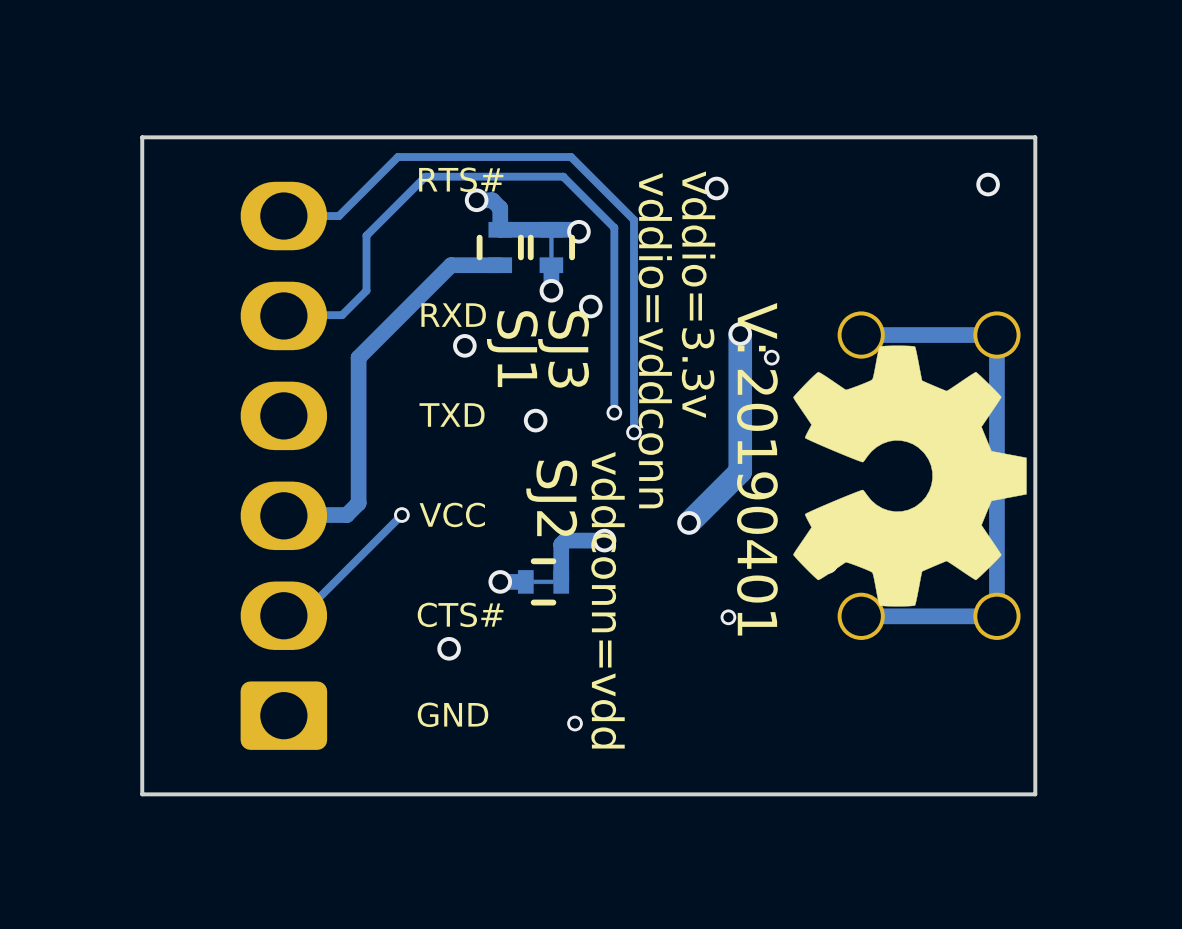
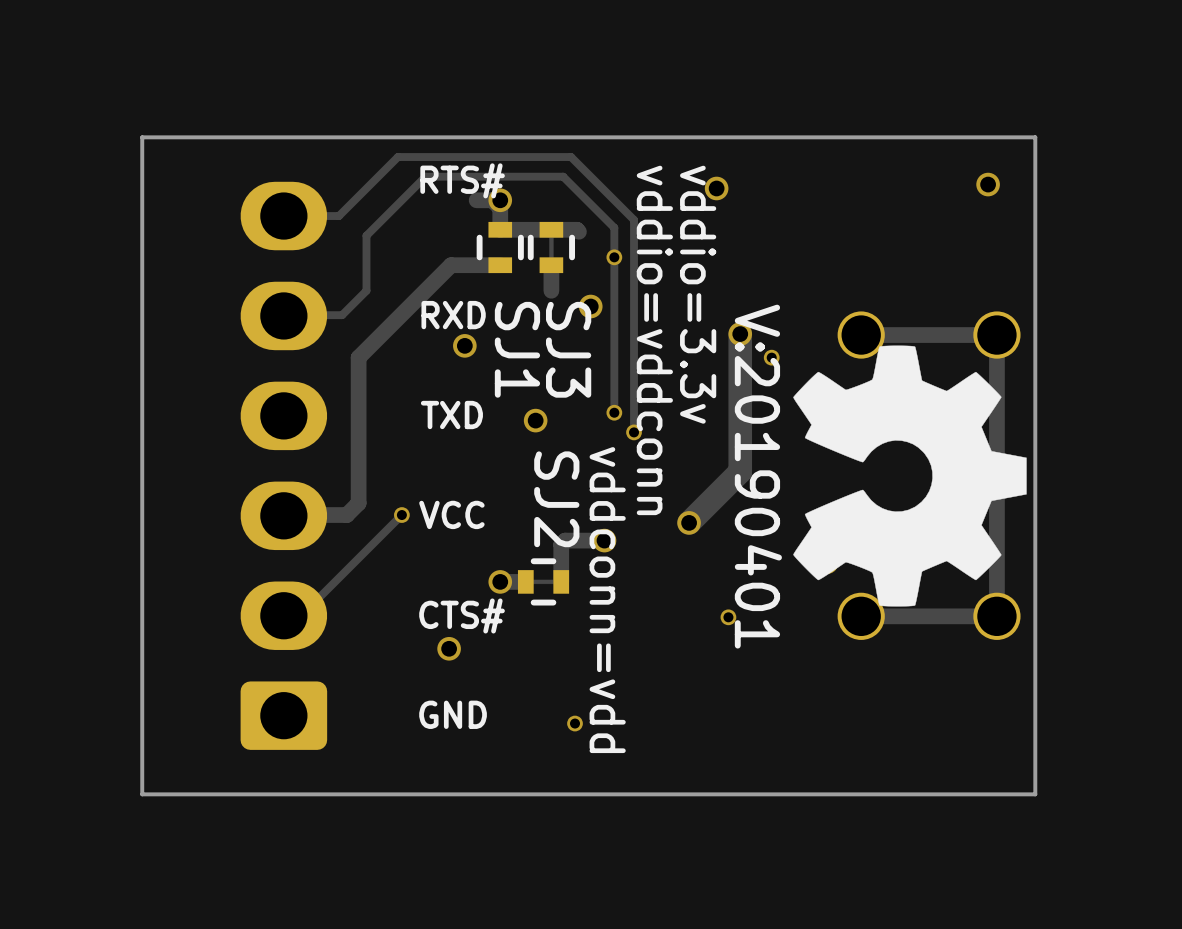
via position: (476, 200) -> (500, 200)
via: (578, 231) -> none
via: none -> (614, 257)
via: (551, 290) -> none

